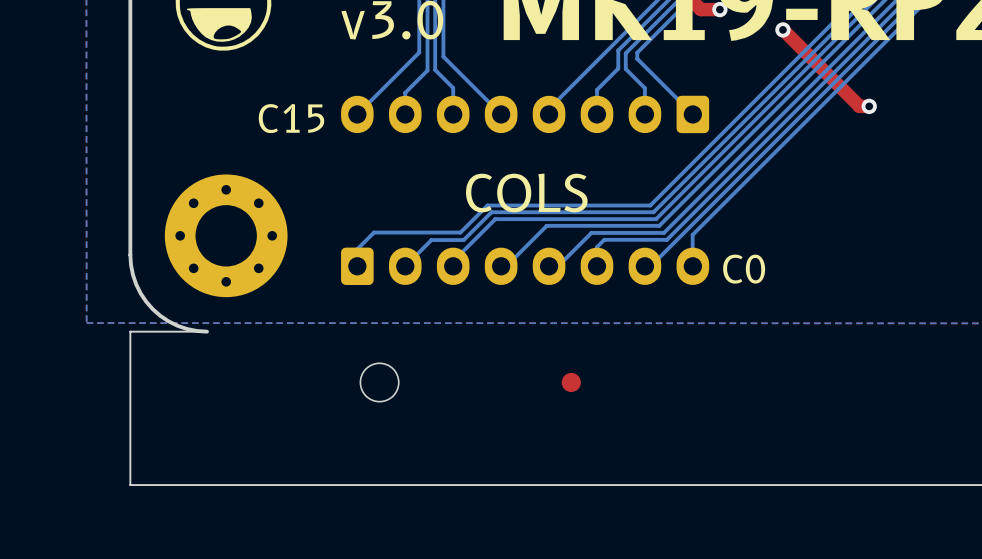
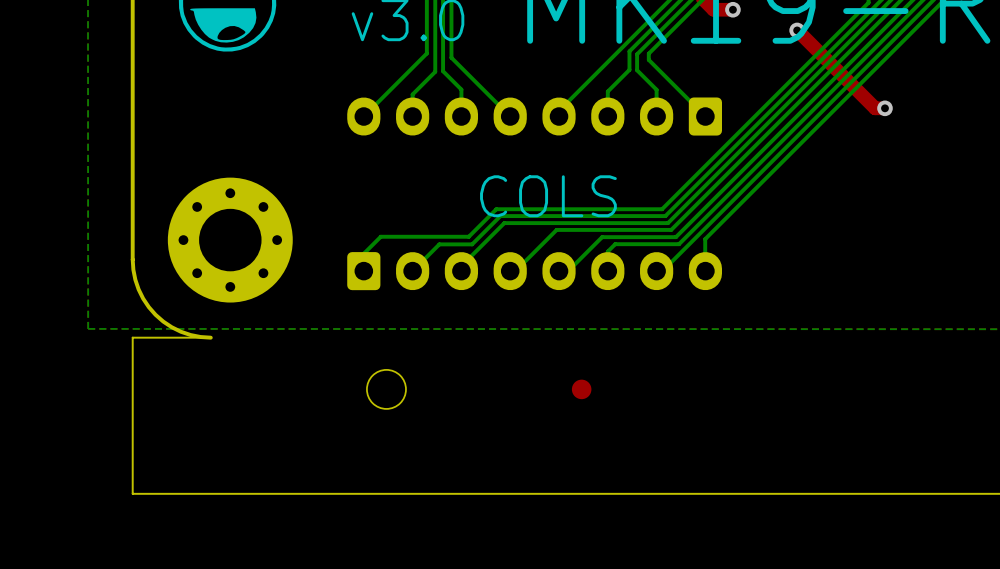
text: C15 (291, 118) -> none
text: C0 (744, 269) -> none

